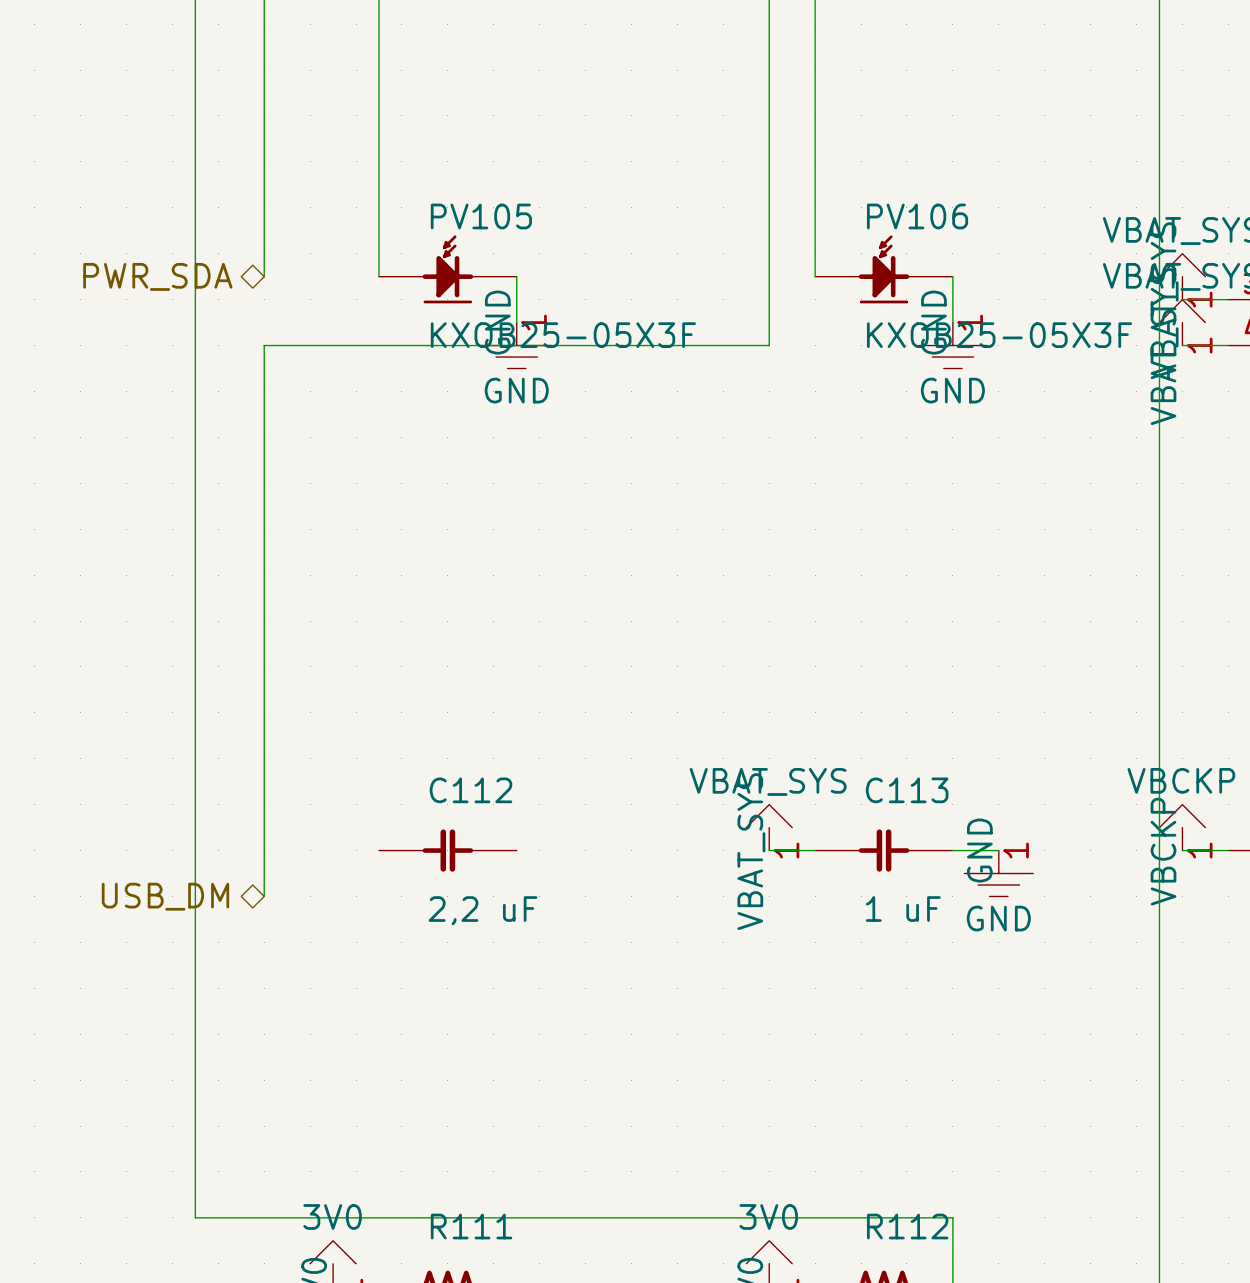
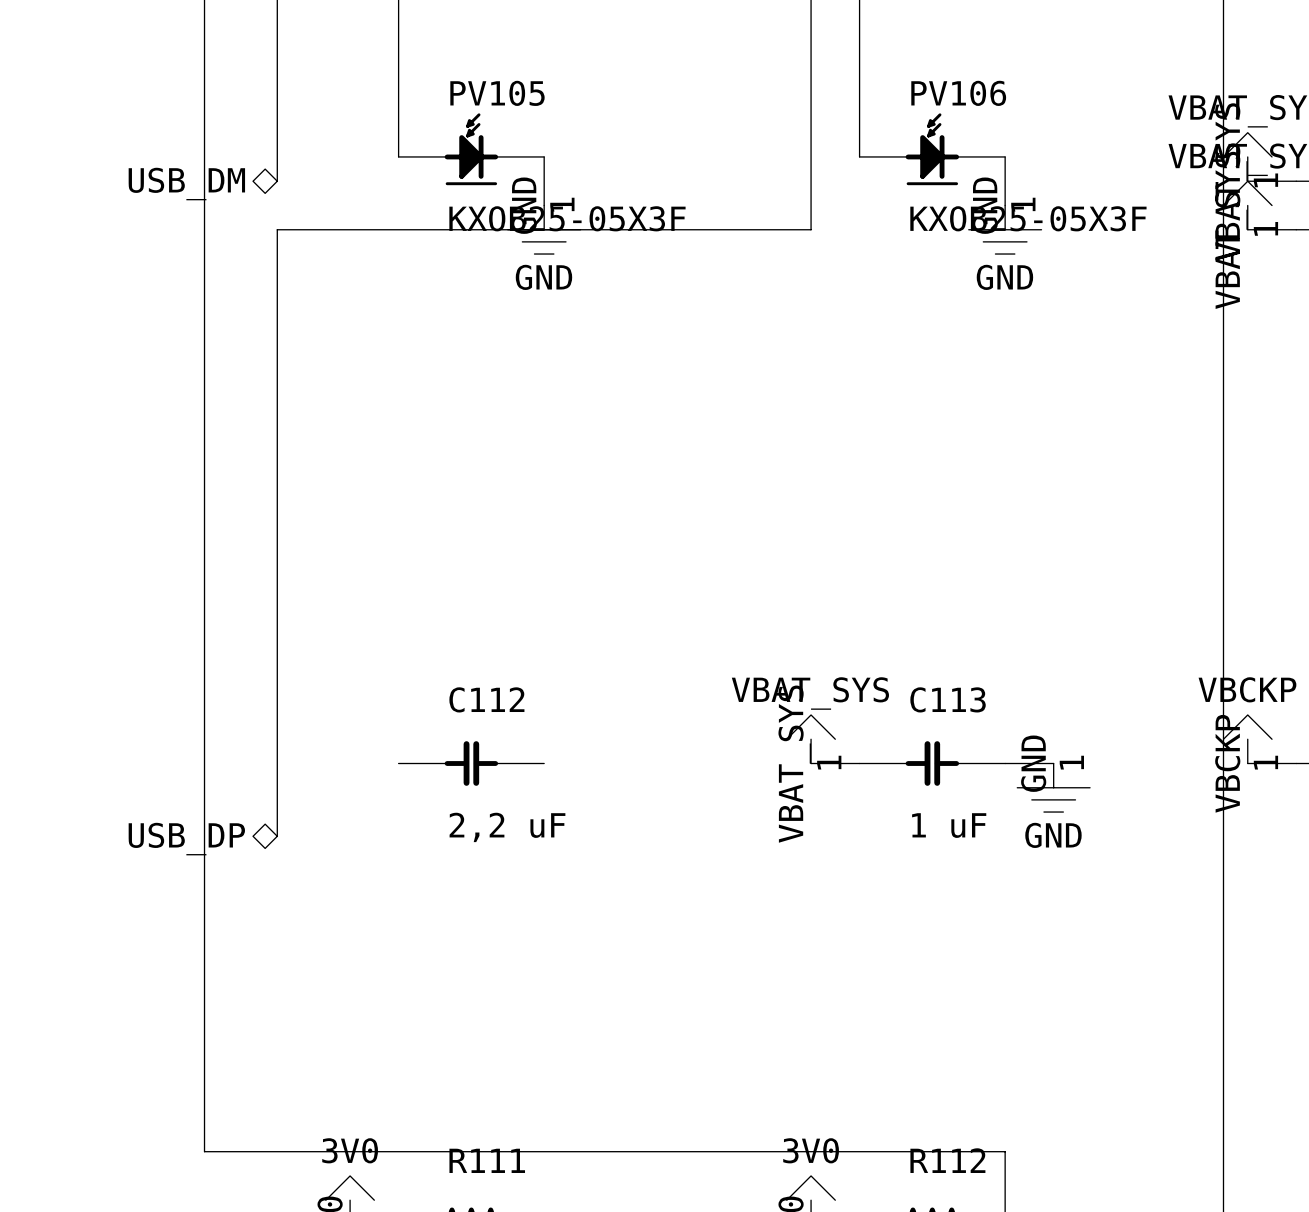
hierarchical label: PWR_SDA (157, 276) -> none
wire: none -> (277, 156) (277, 181)
hierarchical label: none -> USB_DM (186, 184)
hierarchical label: USB_DM (165, 896) -> USB_DP (186, 839)
wire: none -> (277, 812) (277, 836)

